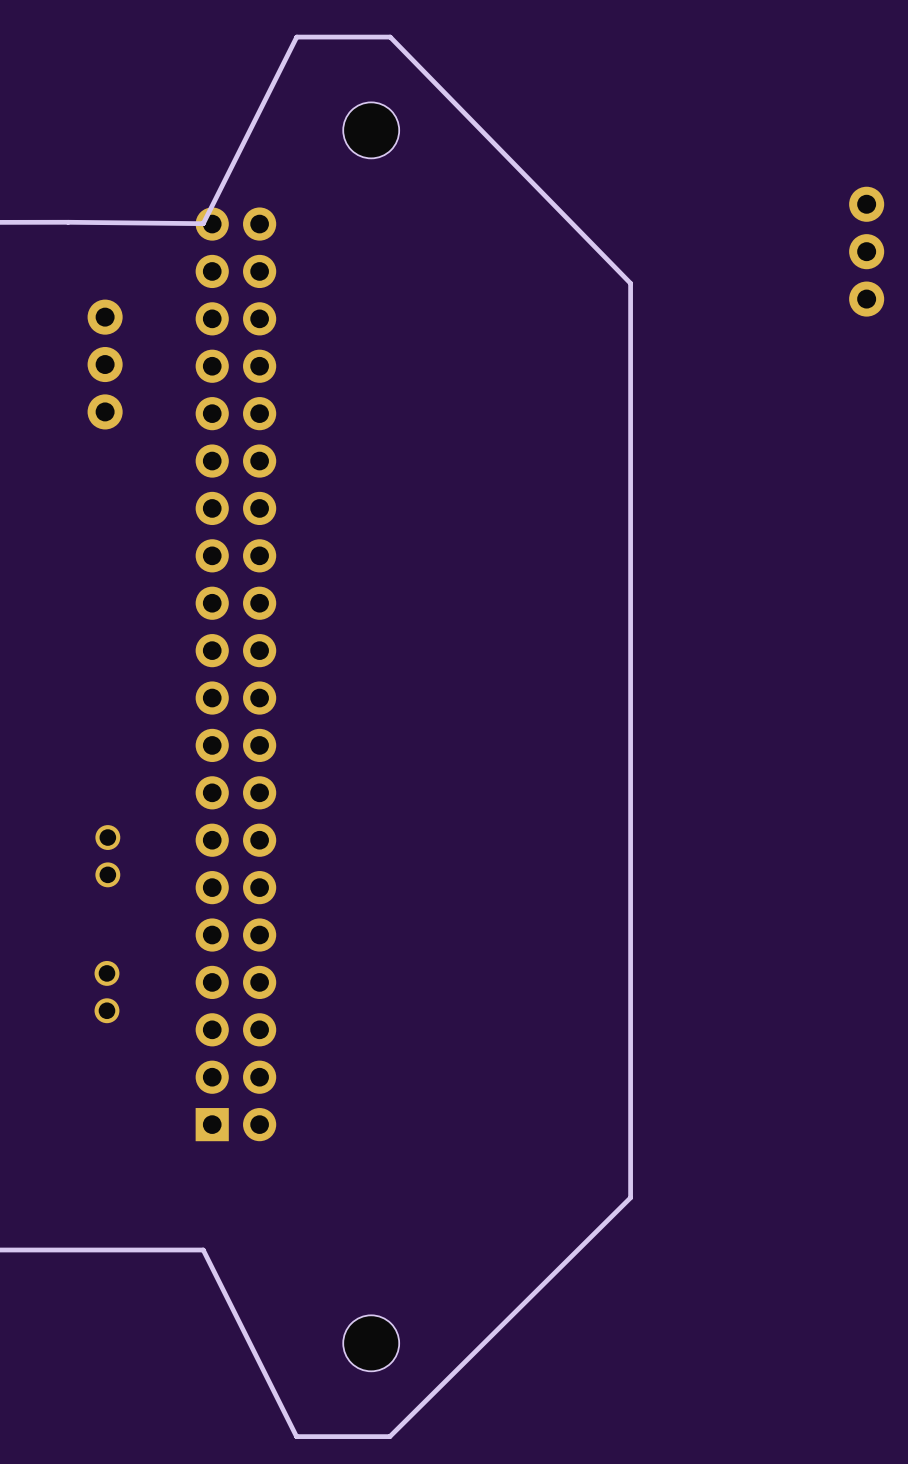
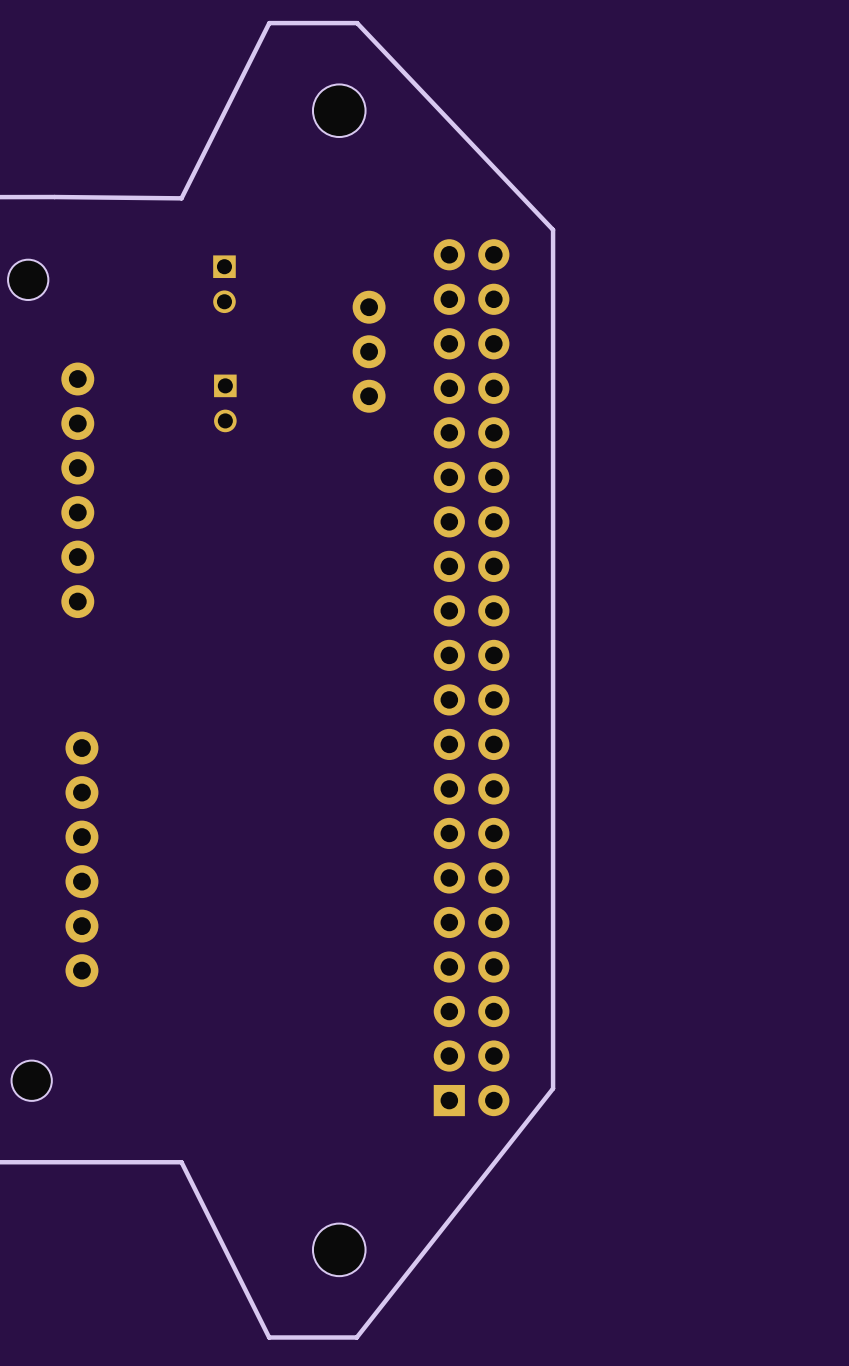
board edge: (390, 37) (630, 283) (630, 1197) (389, 1436) -> (357, 23) (553, 229) (553, 1088) (356, 1337)
part: (866, 251) -> none
hole: none -> (28, 279)
part: none -> (224, 284)
part: (105, 364) -> none
part: none -> (369, 351)
part: none -> (225, 403)
part: none -> (77, 490)
part position: (235, 674) -> (471, 677)
part: (107, 856) -> none
part: none -> (81, 859)
part: (106, 992) -> none
hole: none -> (31, 1080)

